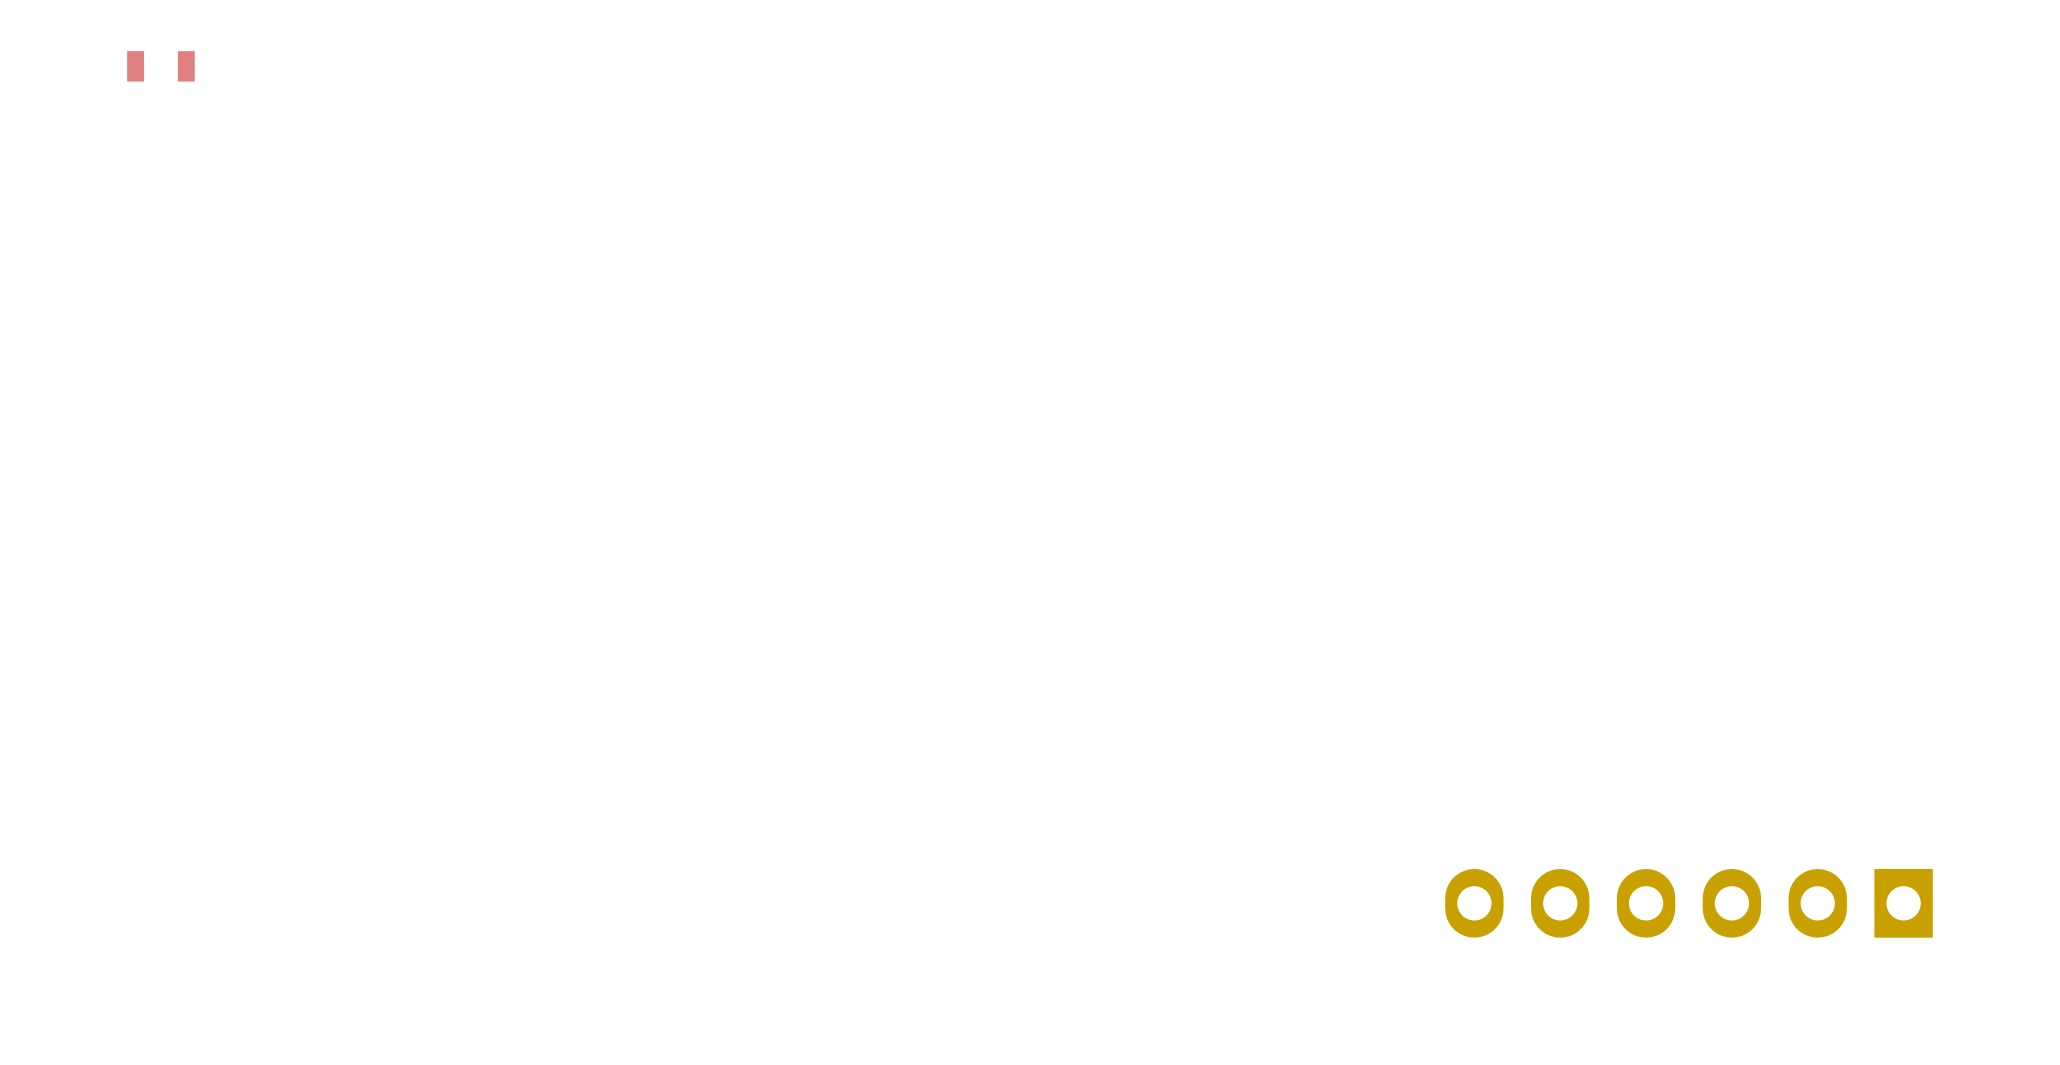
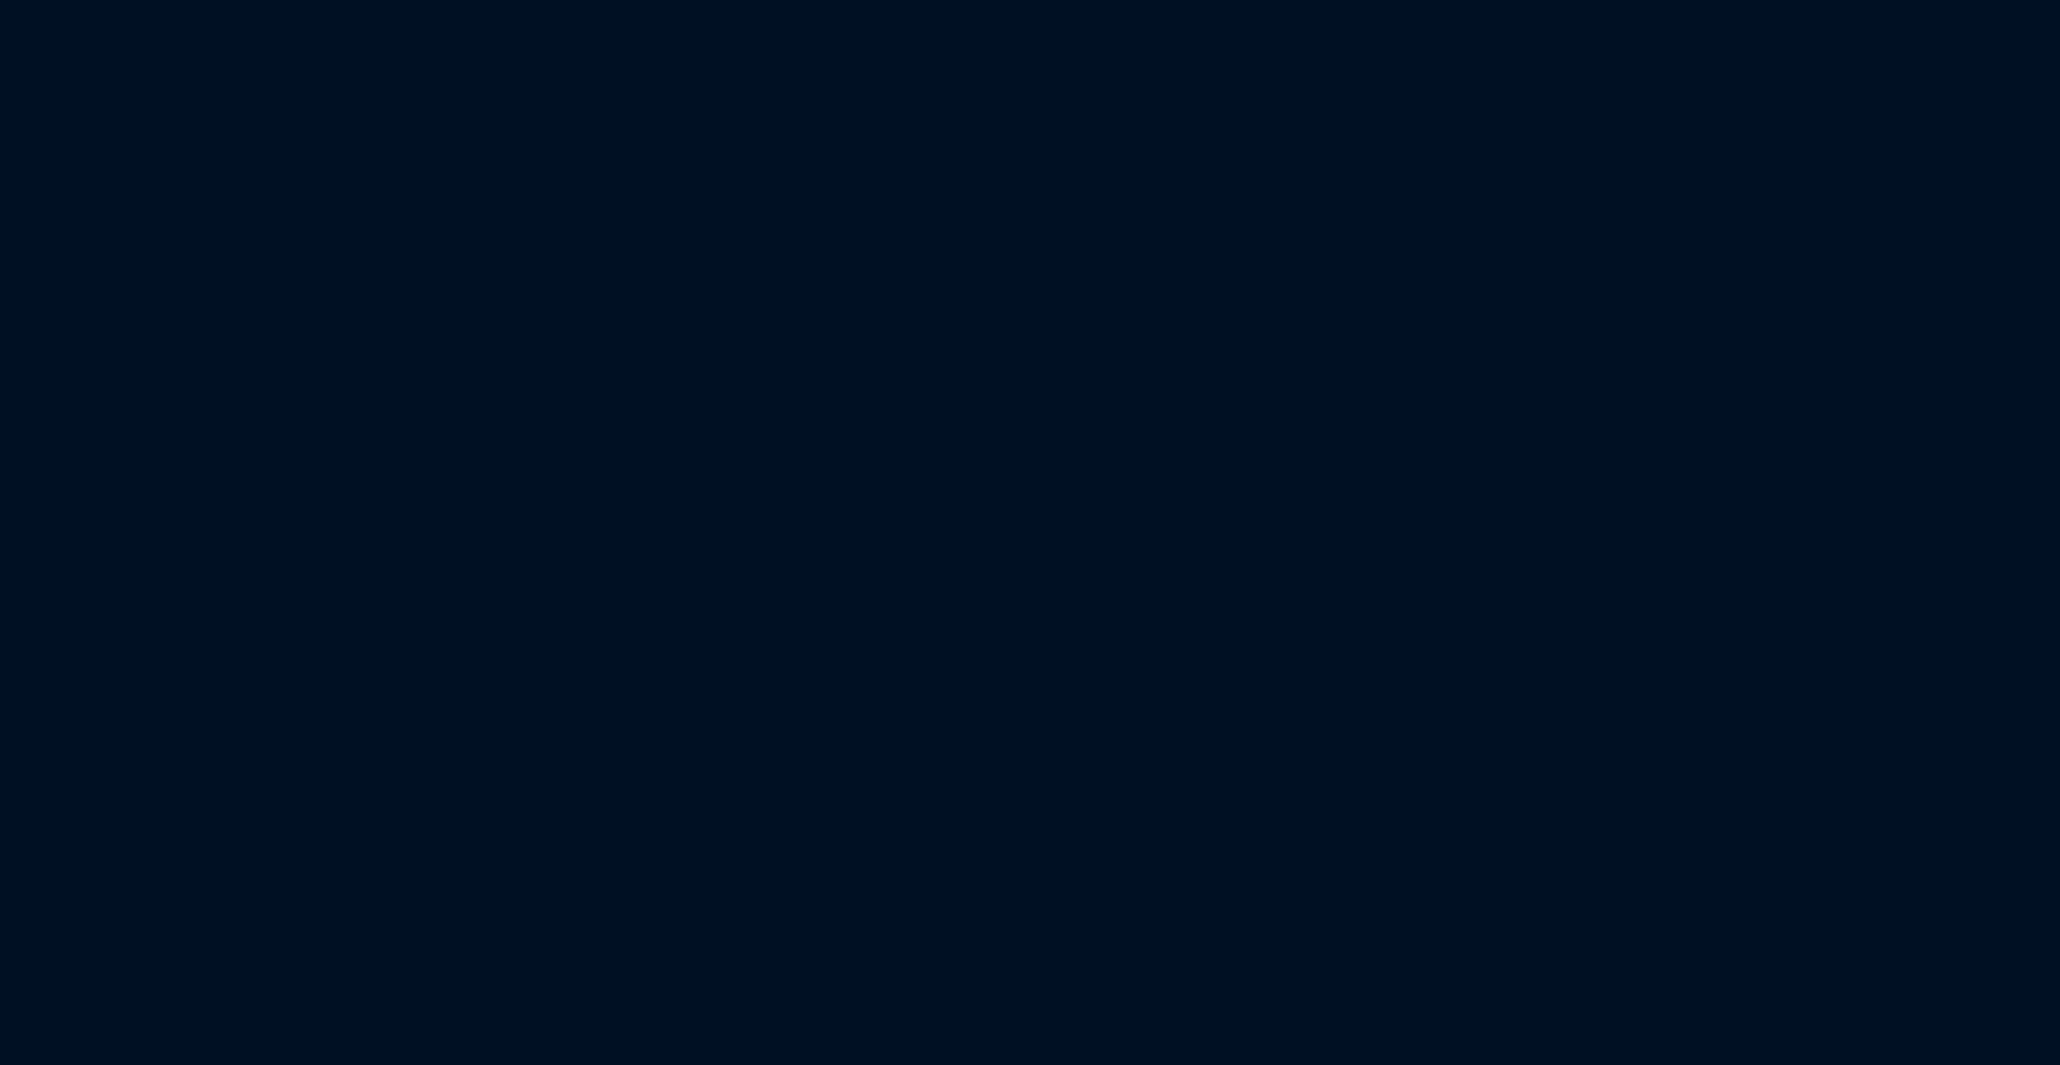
part: (160, 66) -> none
part: (1688, 903) -> none

